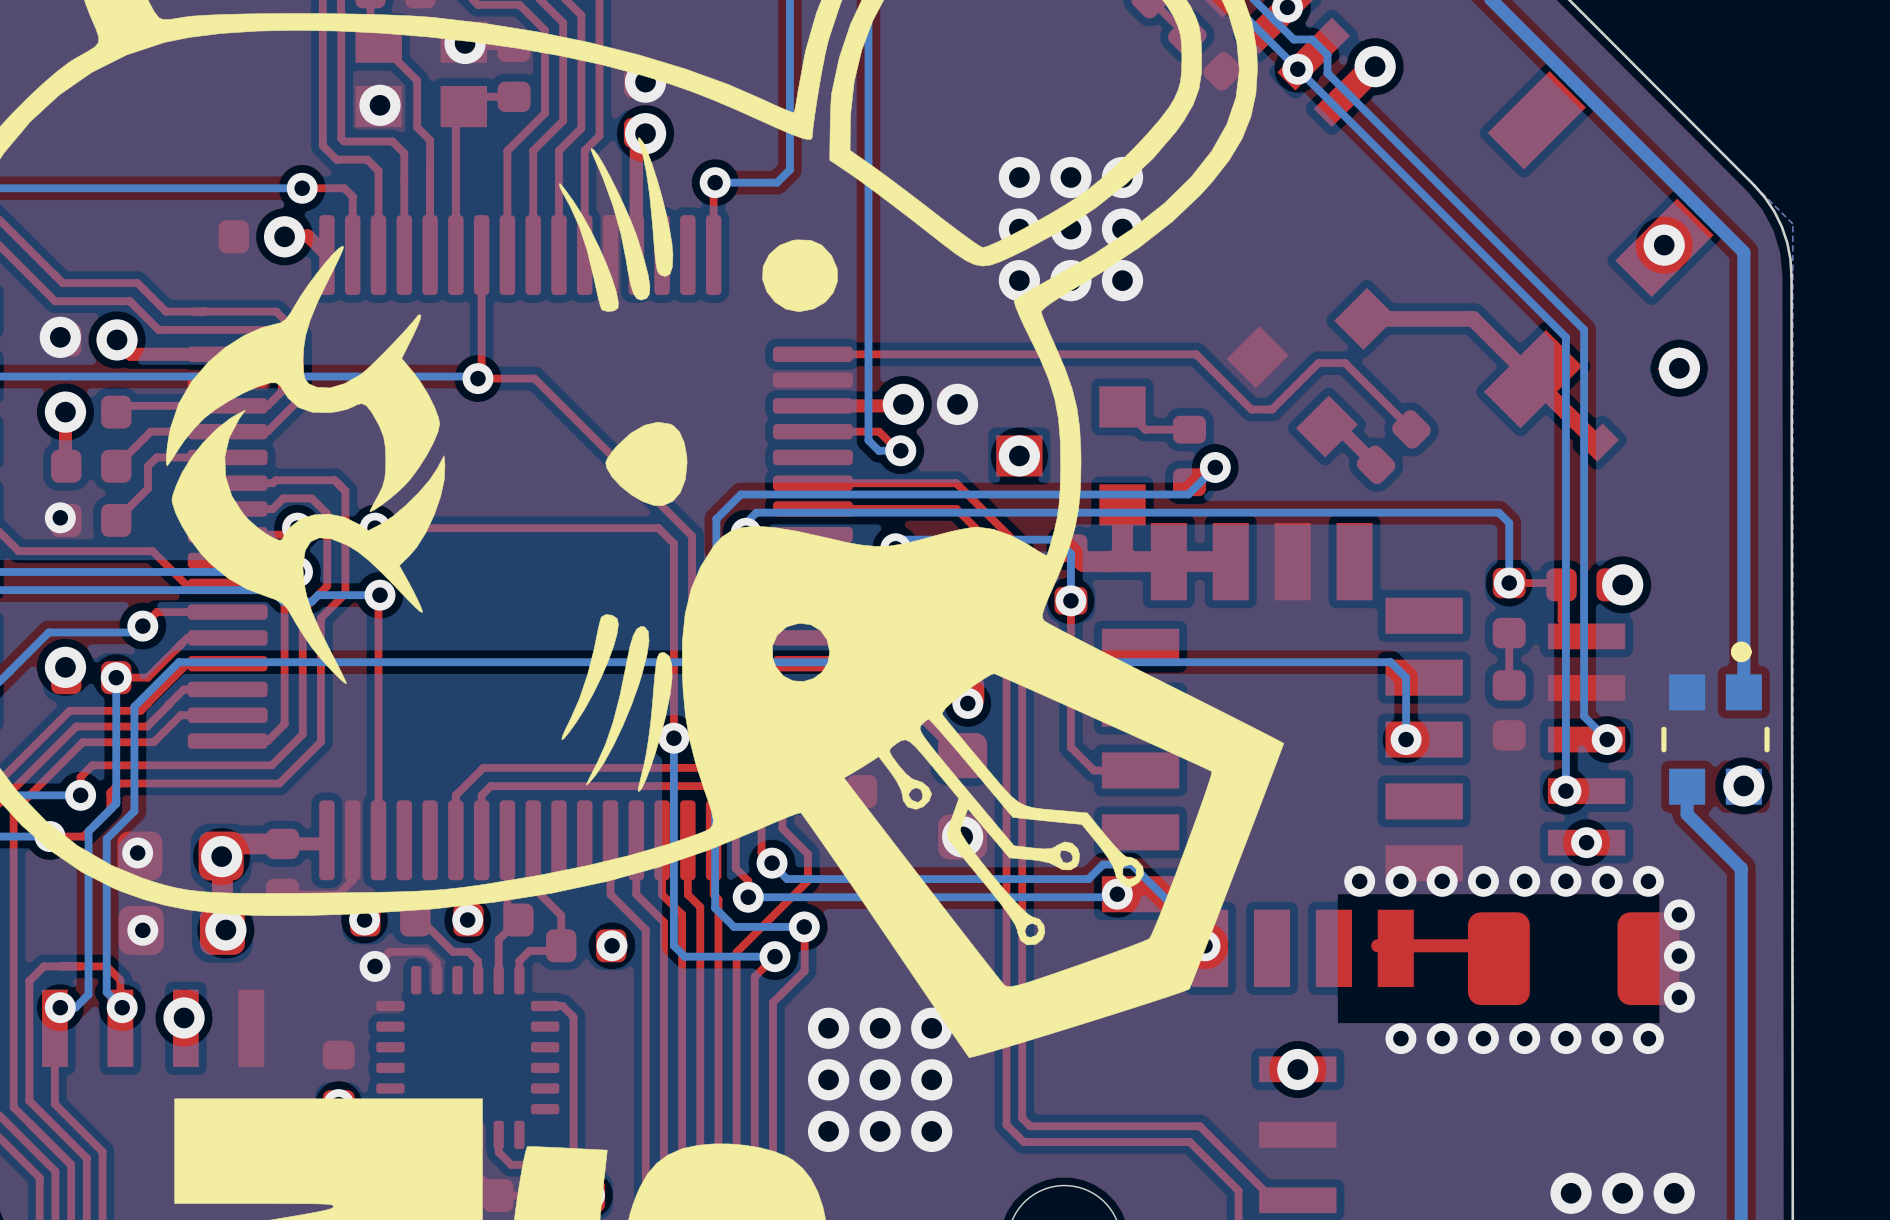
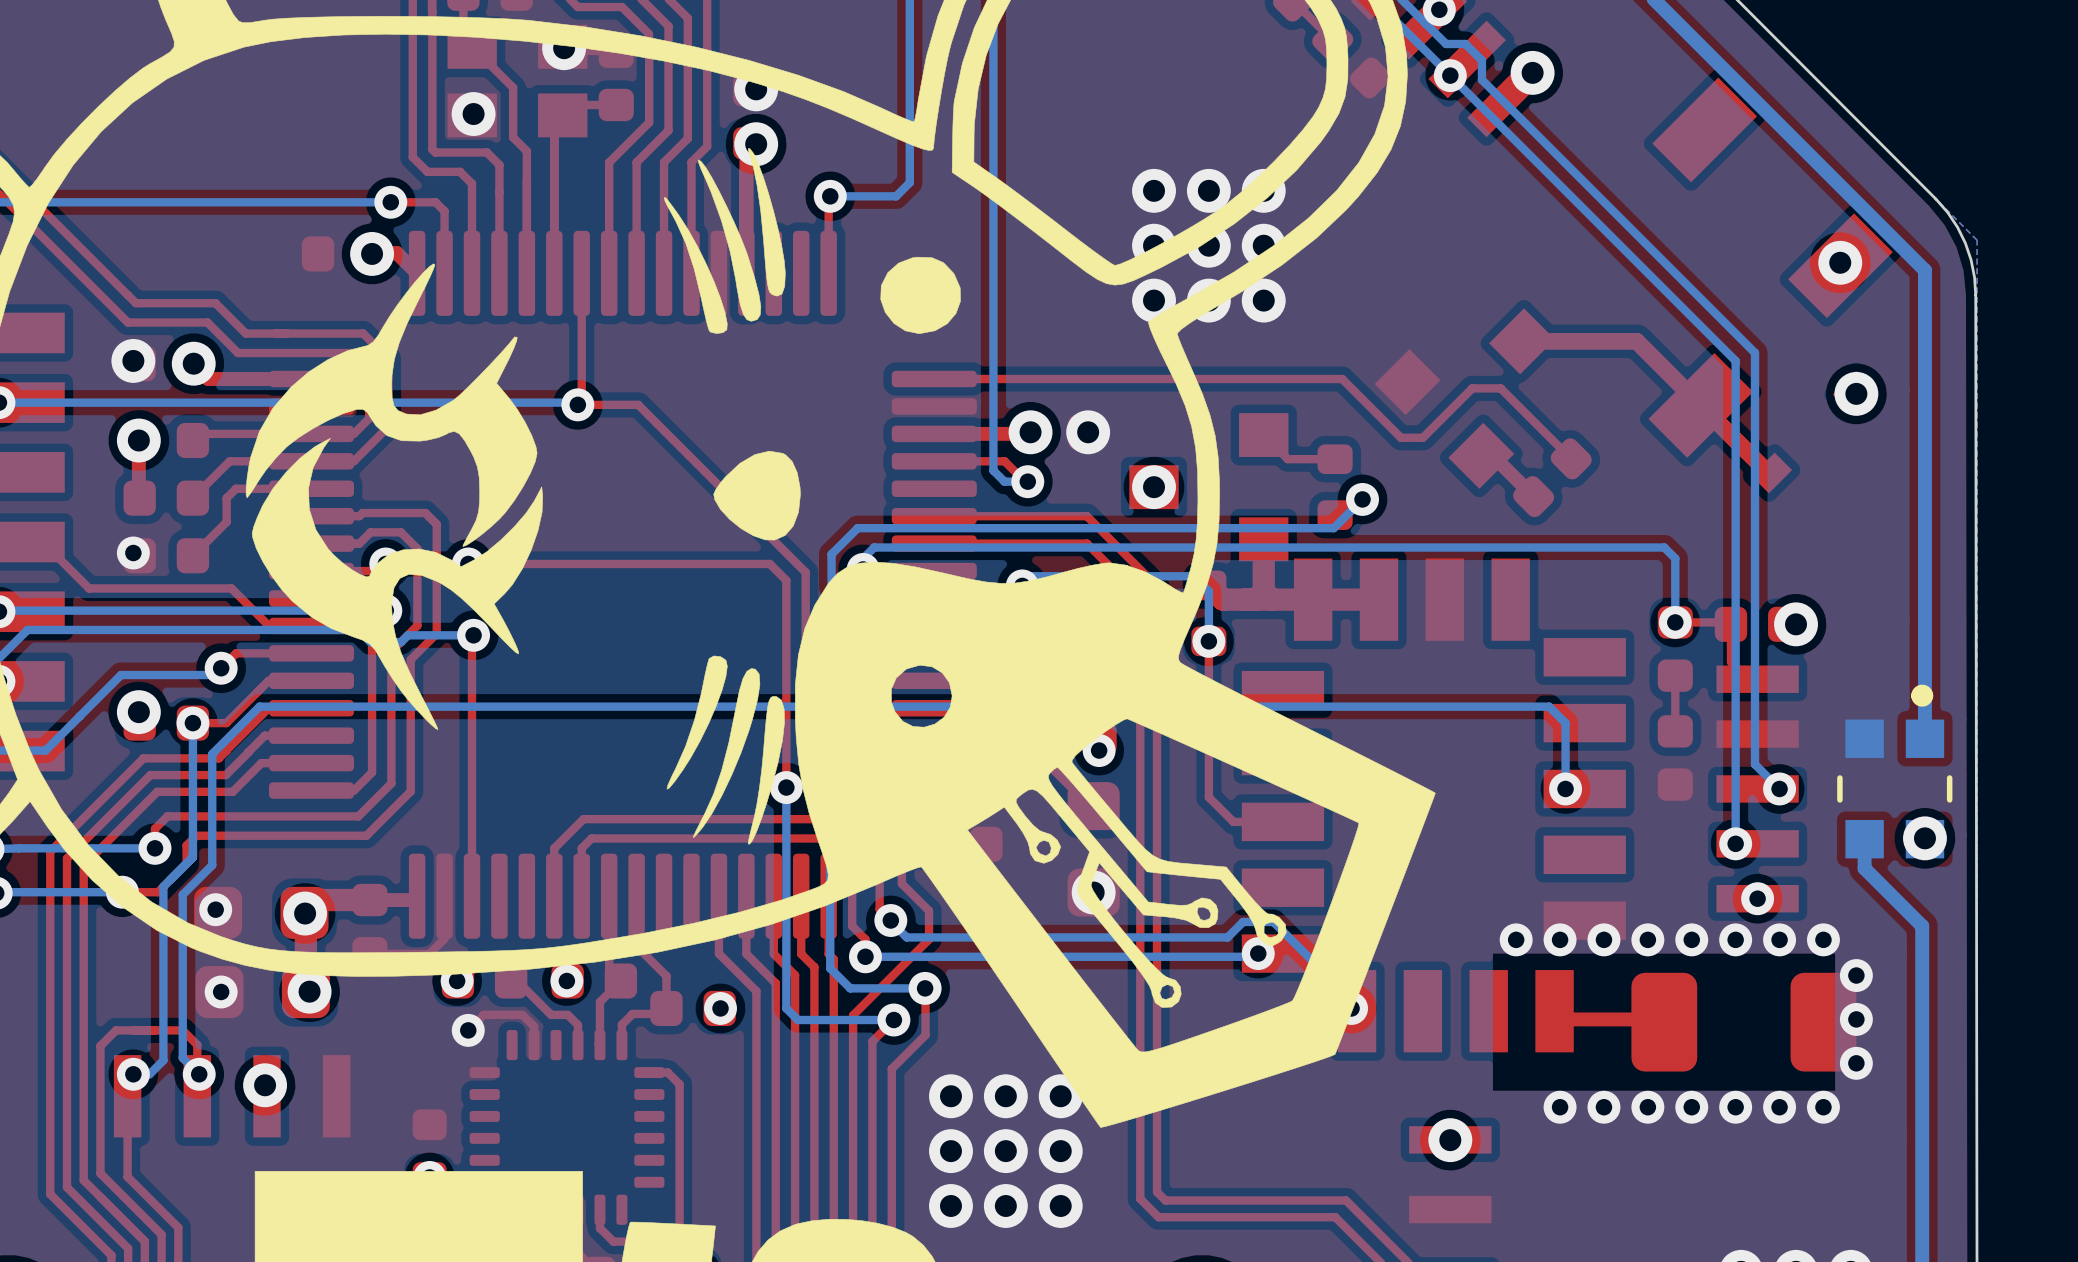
top track: (1498, 945) (1377, 945) -> (1678, 1019) (1549, 1019)

